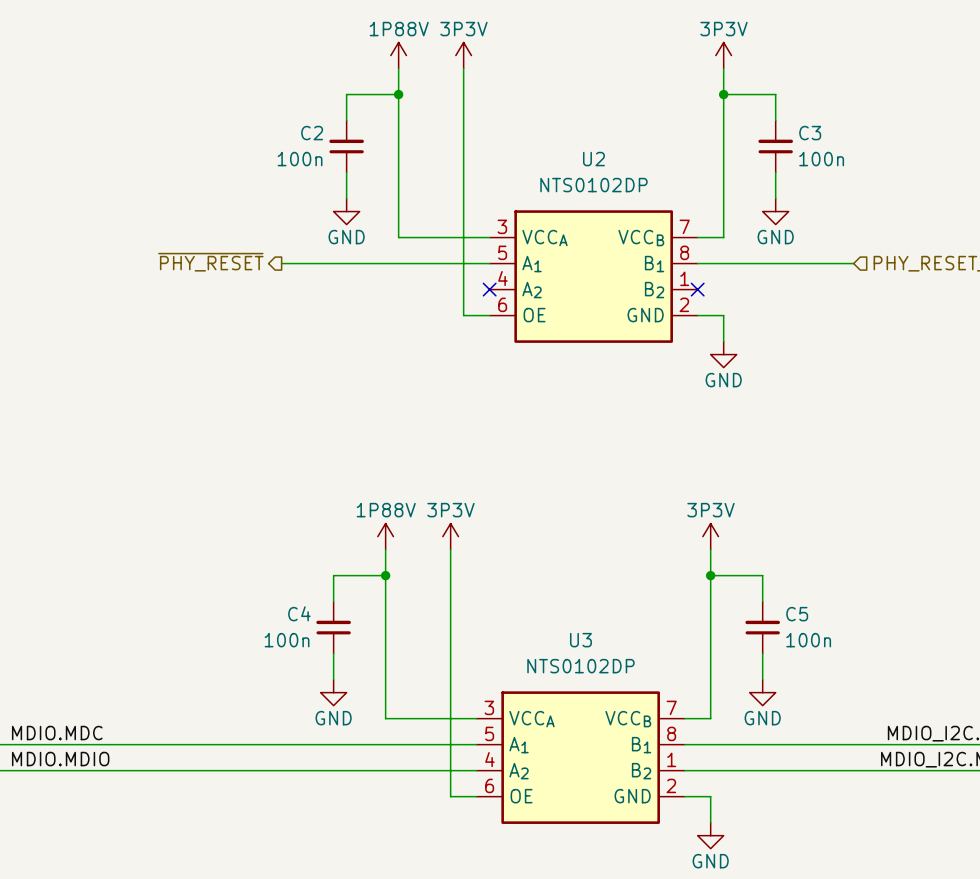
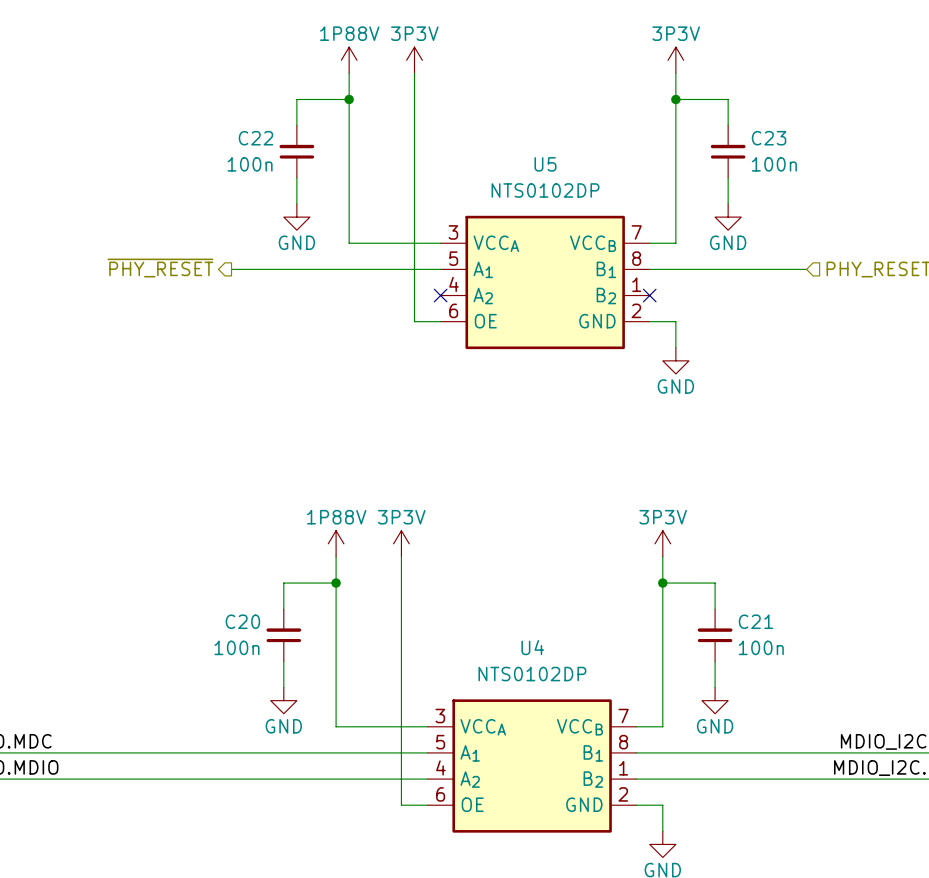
C2 name: C2 (312, 133) -> C22 (255, 138)
C3 name: C3 (810, 133) -> C23 (769, 138)
U2 name: U2 (593, 159) -> U5 (545, 164)
C4 name: C4 (299, 613) -> C20 (242, 621)
C5 name: C5 (797, 614) -> C21 (755, 621)
U3 name: U3 (580, 640) -> U4 (532, 647)

